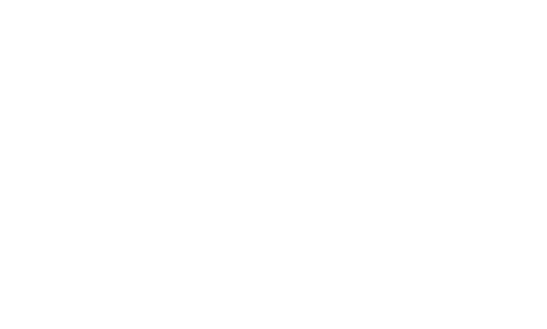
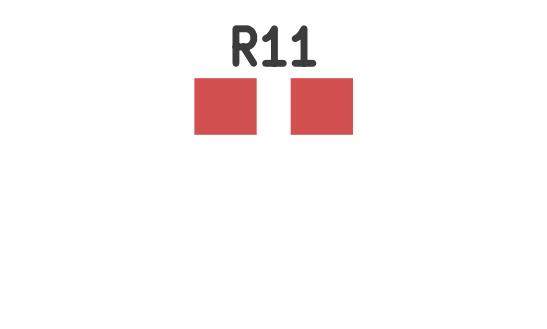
R11: none -> (273, 106)

